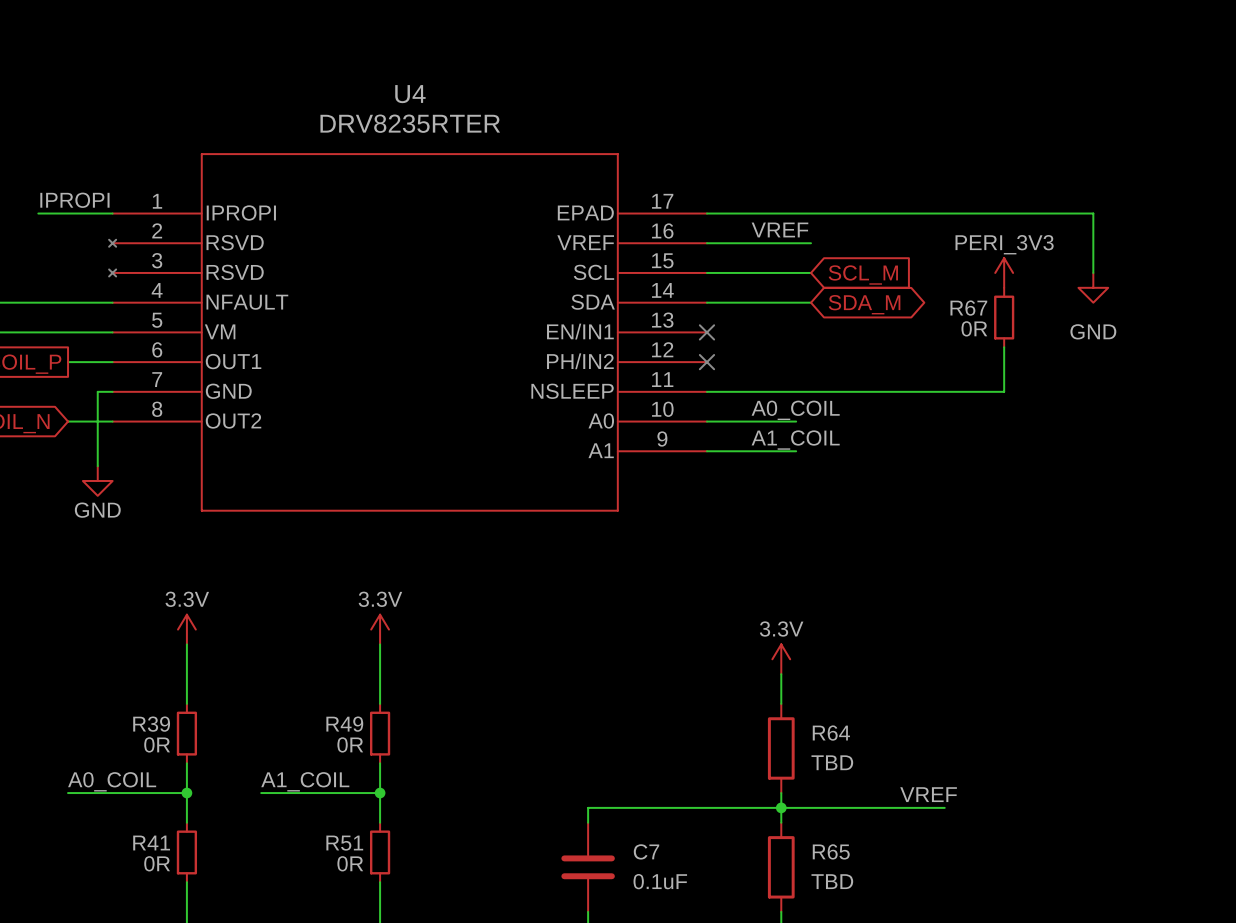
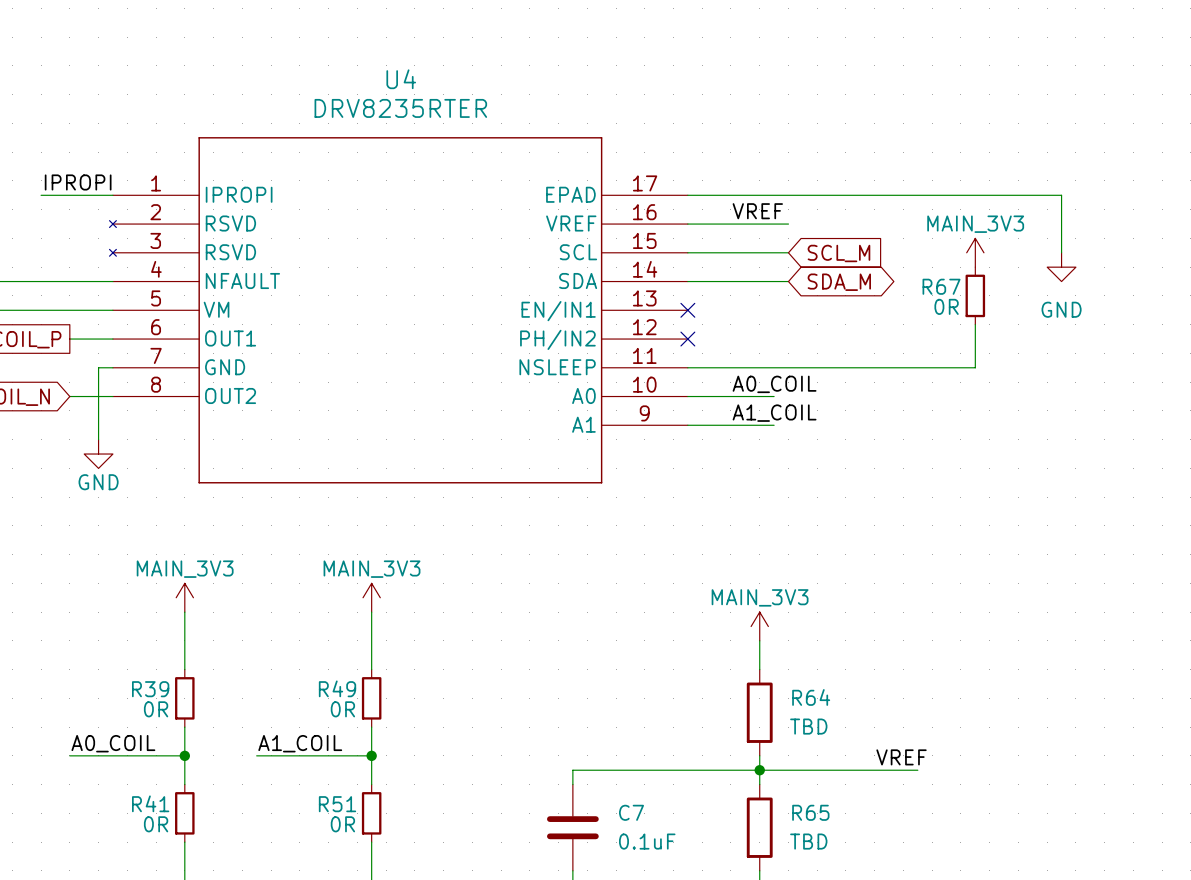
power symbol: PERI_3V3 (1004, 272) -> MAIN_3V3 (975, 252)
power symbol: 3.3V (186, 629) -> MAIN_3V3 (184, 597)
power symbol: 3.3V (380, 629) -> MAIN_3V3 (371, 597)
power symbol: 3.3V (781, 659) -> MAIN_3V3 (759, 626)

